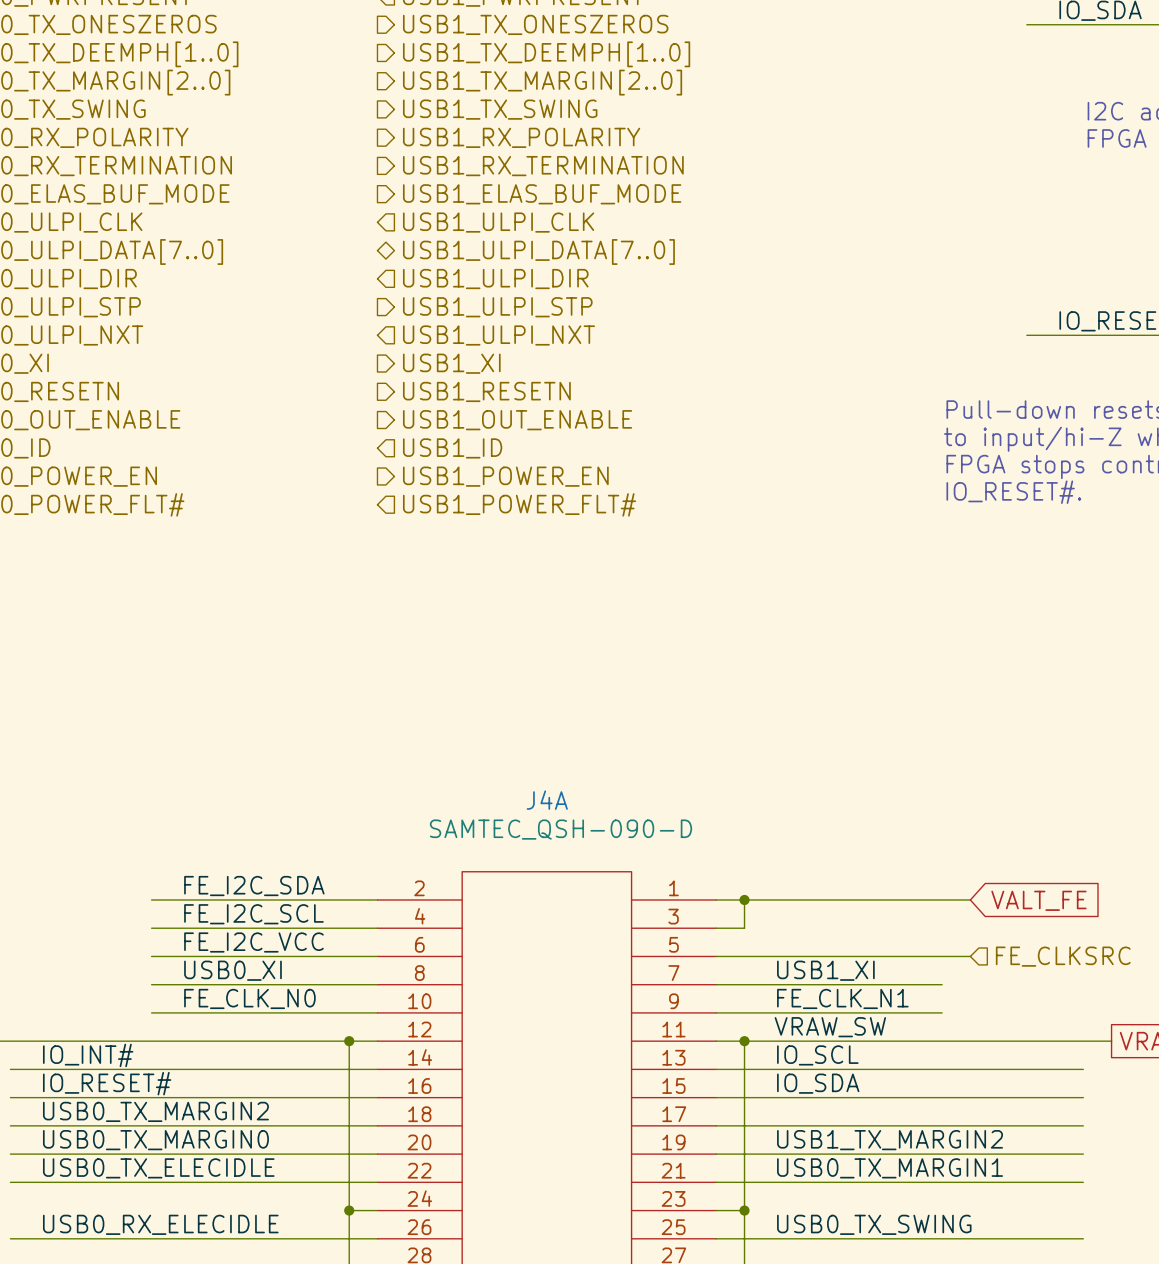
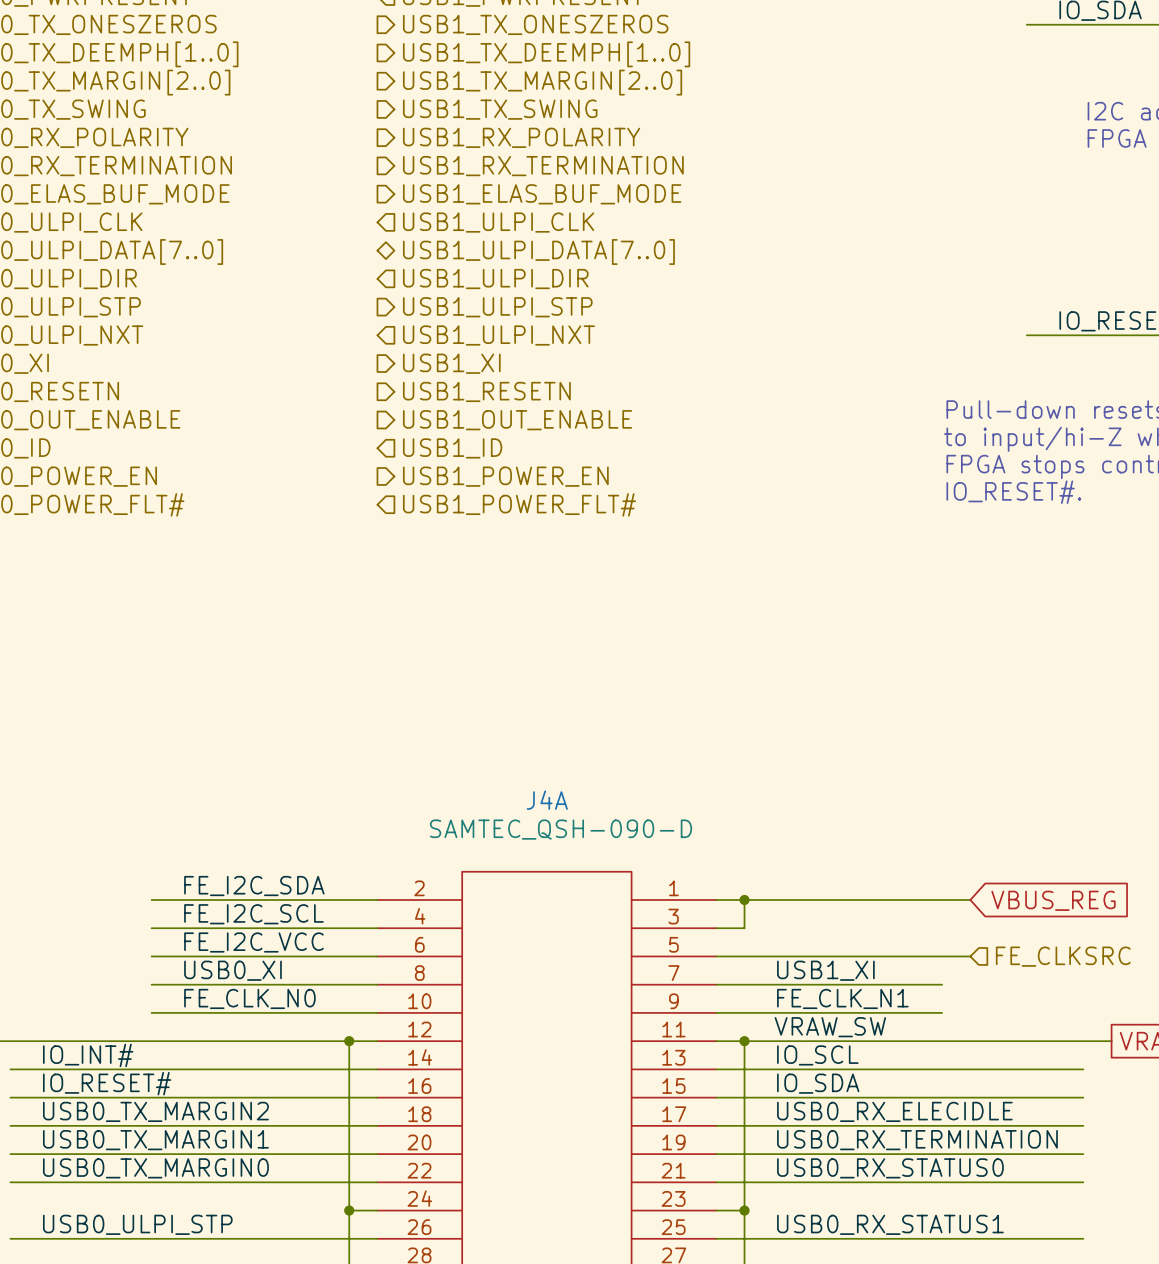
global label: VALT_FE (1038, 900) -> VBUS_REG (1053, 900)
label: none -> USB0_RX_ELECIDLE (894, 1111)
label: USB0_TX_MARGIN0 (155, 1140) -> USB0_TX_MARGIN1 (155, 1140)
label: USB1_TX_MARGIN2 (890, 1140) -> USB0_RX_TERMINATION (917, 1140)
label: USB0_TX_ELECIDLE (158, 1168) -> USB0_TX_MARGIN0 (155, 1168)
label: USB0_TX_MARGIN1 (890, 1168) -> USB0_RX_STATUS0 (890, 1168)
label: USB0_RX_ELECIDLE (160, 1224) -> USB0_ULPI_STP (137, 1224)
label: USB0_TX_SWING (874, 1224) -> USB0_RX_STATUS1 (890, 1224)

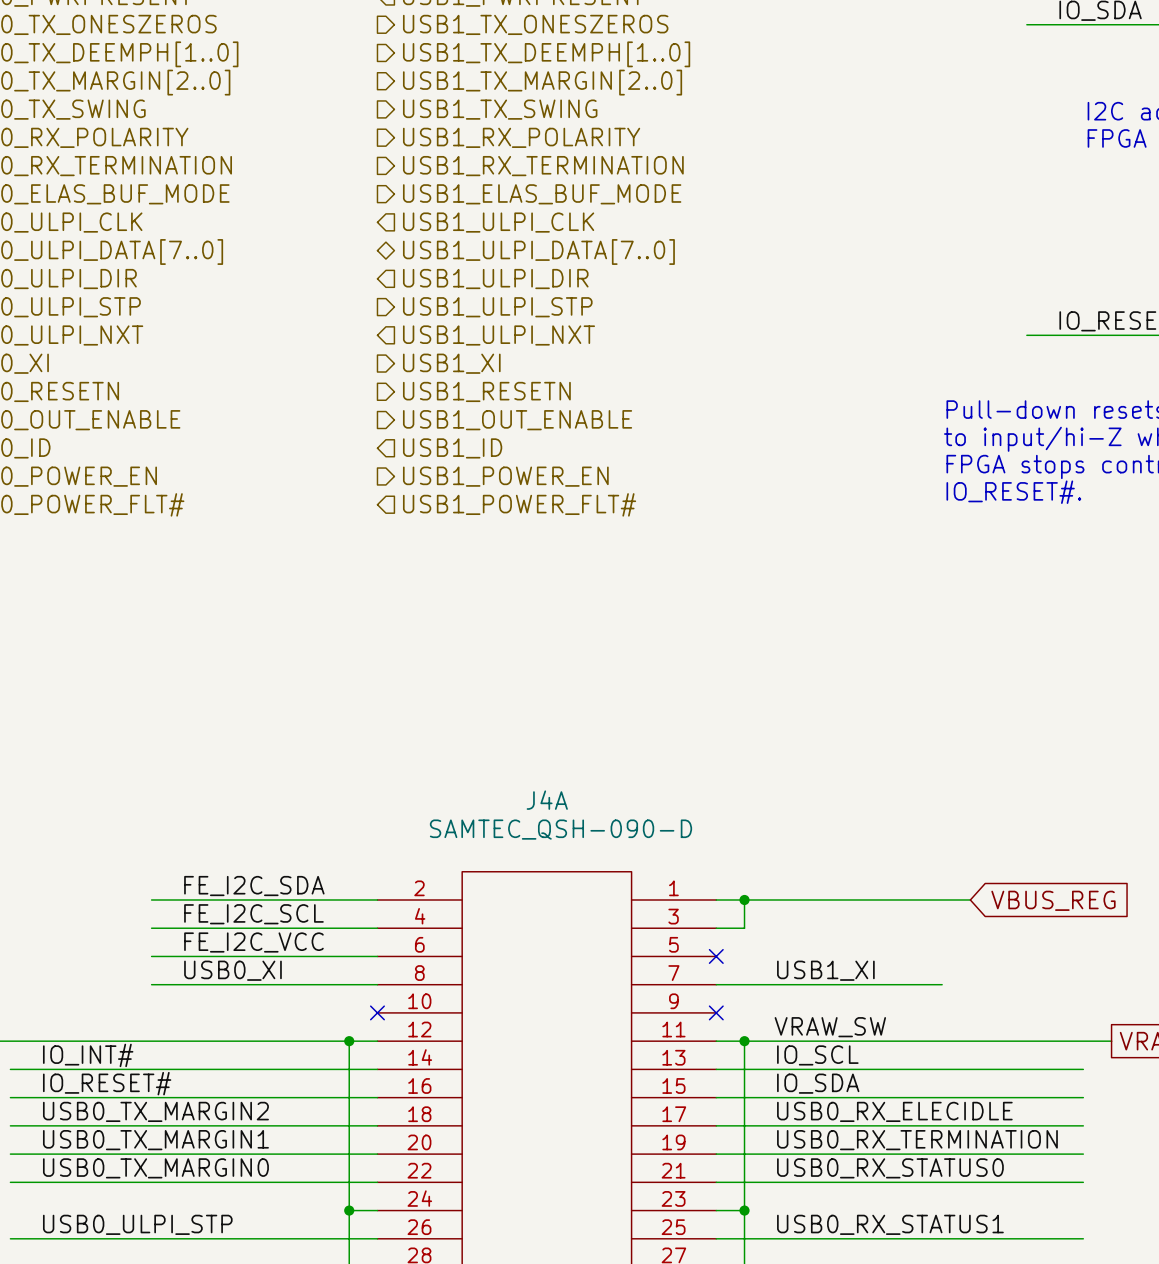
wire: (716, 956) (970, 956) -> none
no-connect mark: none -> (716, 956)
hierarchical label: FE_CLKSRC (1063, 956) -> none
label: FE_CLK_N0 (249, 998) -> none
label: FE_CLK_N1 (842, 998) -> none
wire: (151, 1012) (377, 1012) -> none
no-connect mark: none -> (377, 1012)
wire: (716, 1012) (942, 1012) -> none
no-connect mark: none -> (716, 1012)

